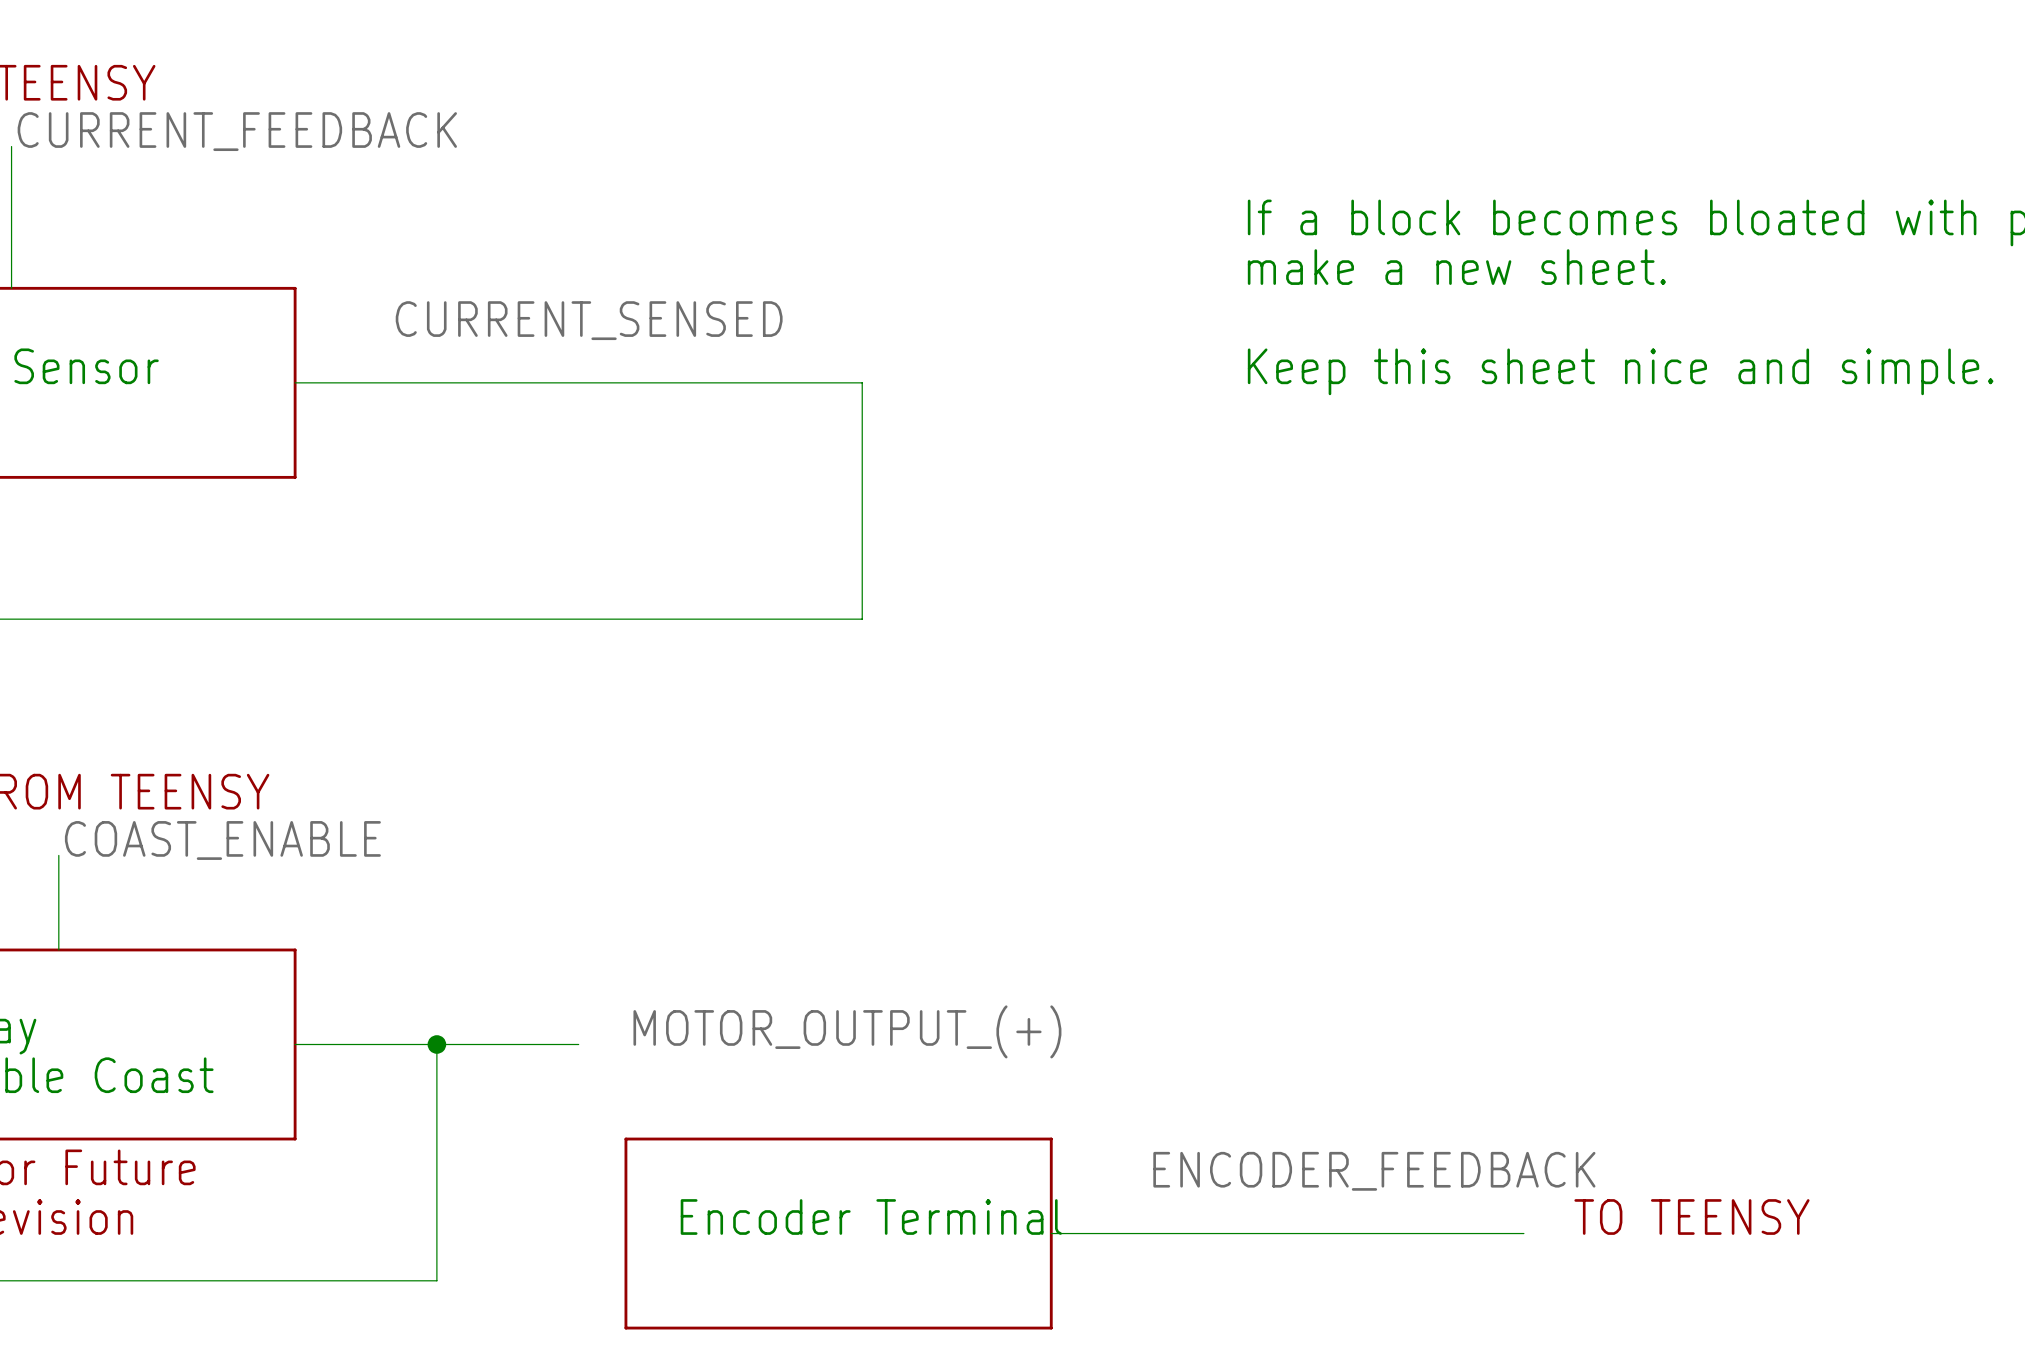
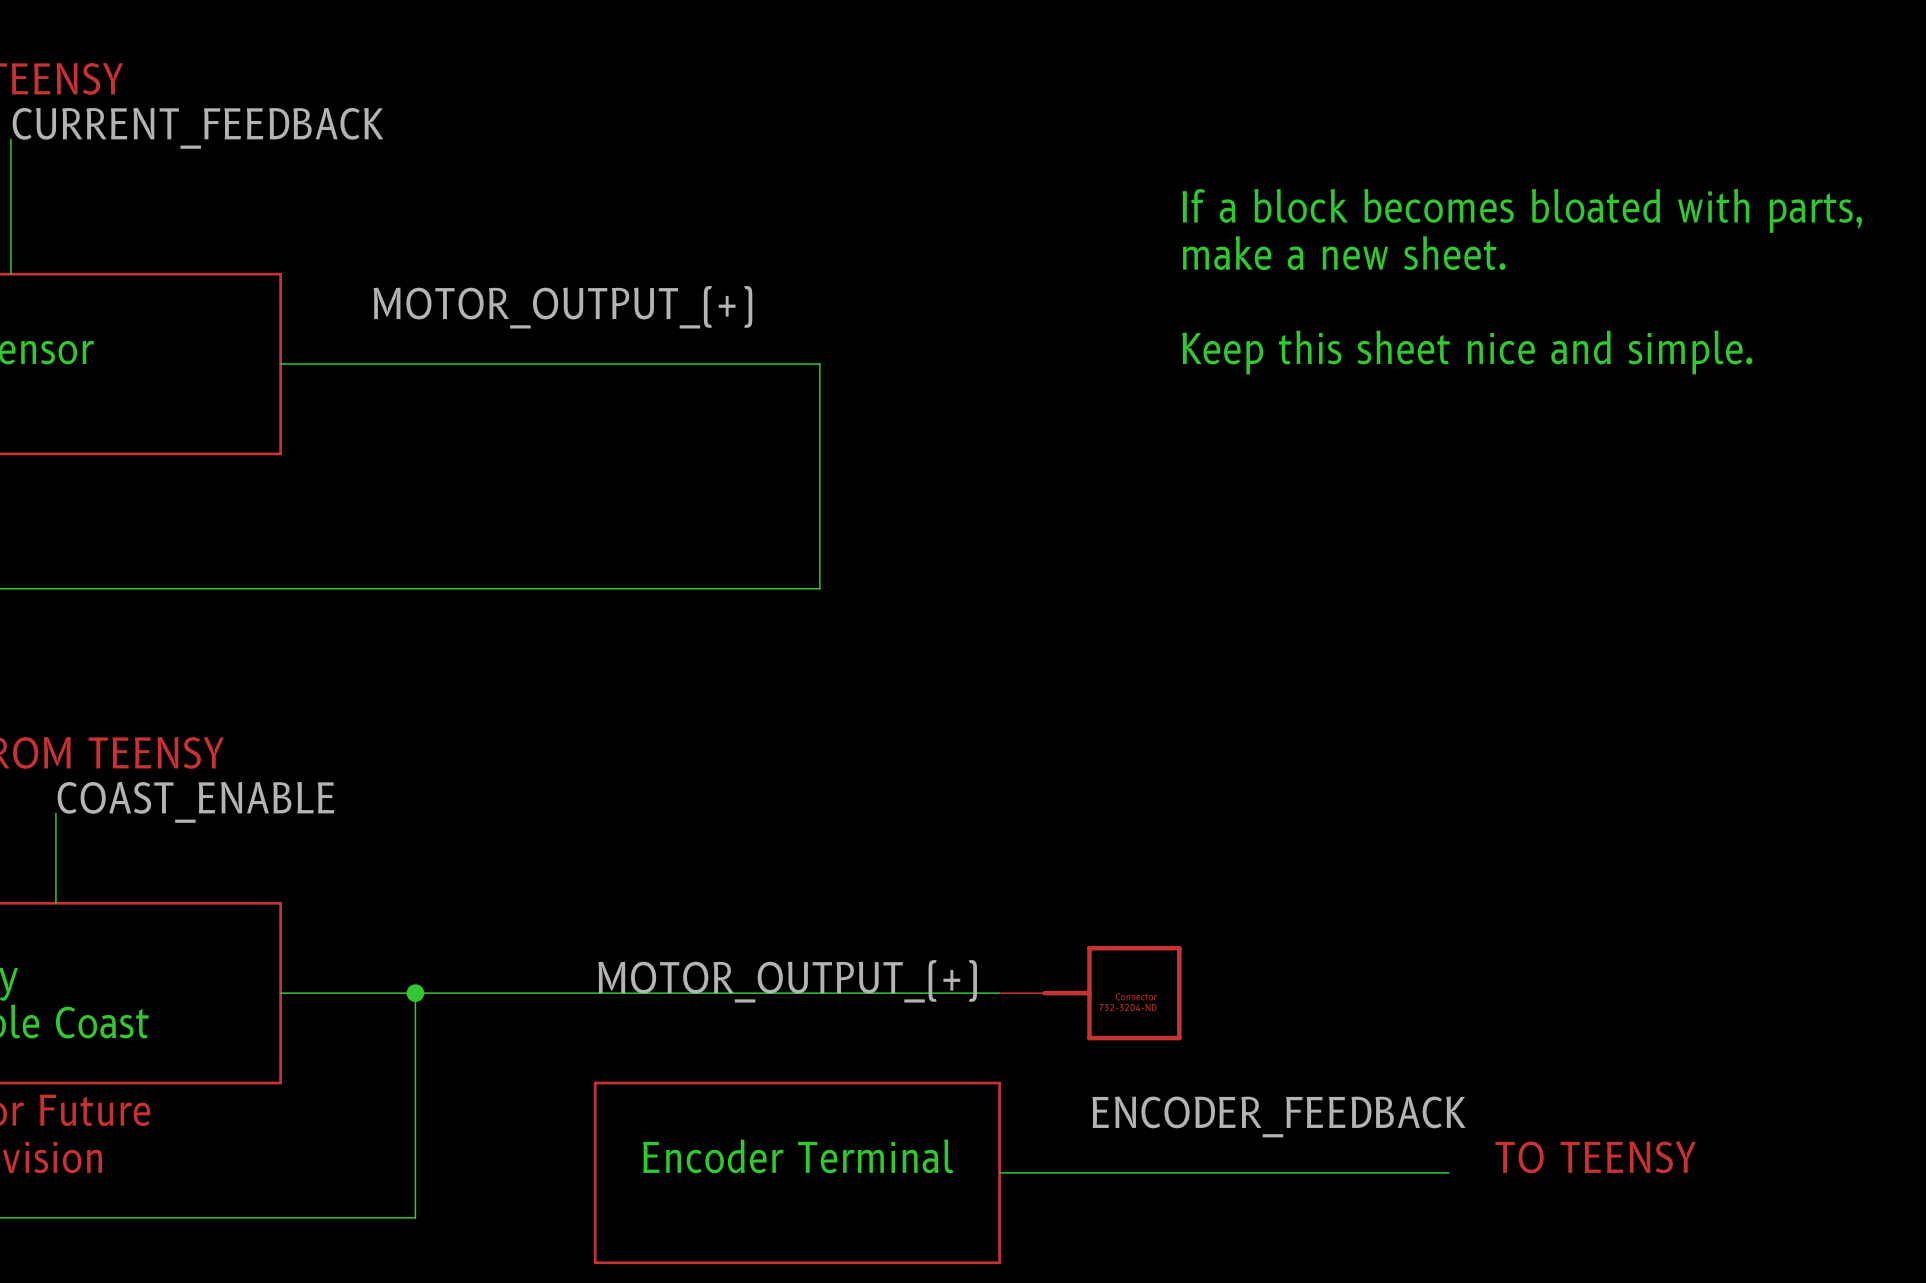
label: CURRENT_SENSED (589, 320) -> MOTOR_OUTPUT_(+) (562, 307)
wire: none -> (550, 993) (999, 993)
part: none -> (1090, 993)

